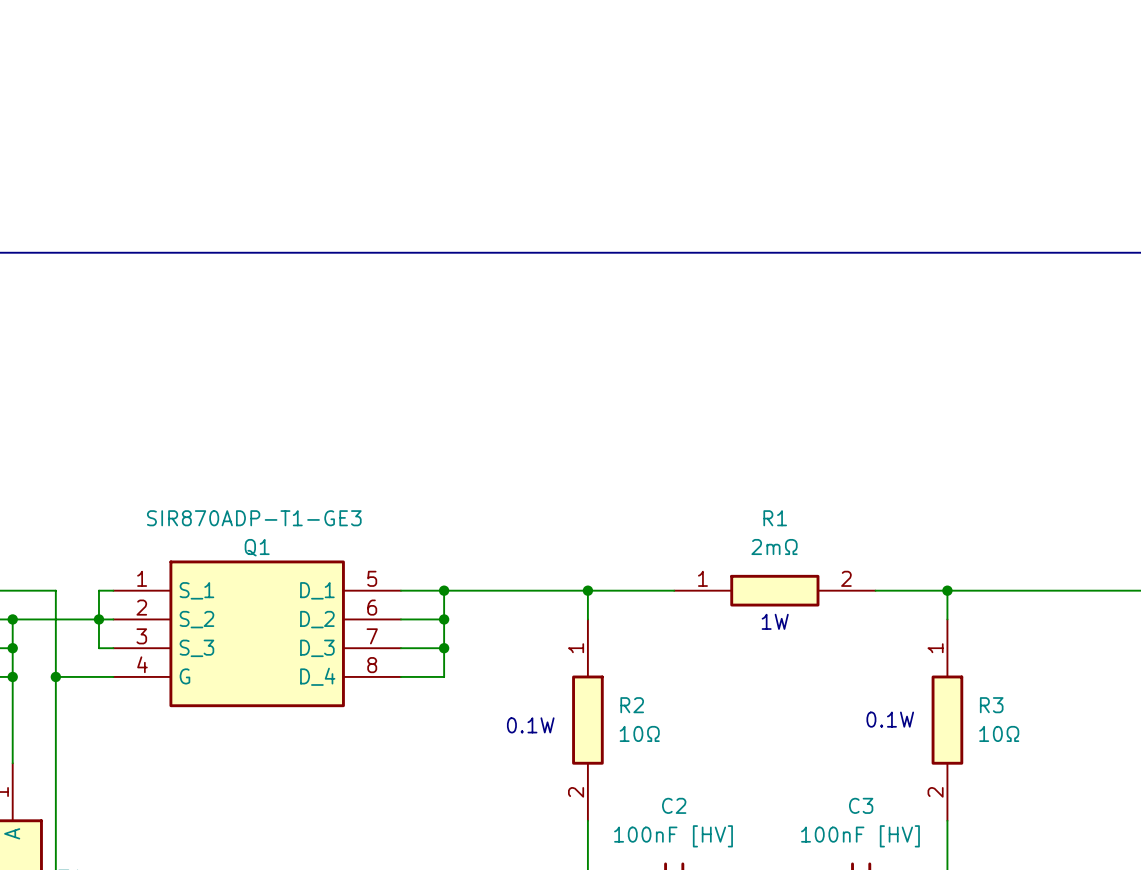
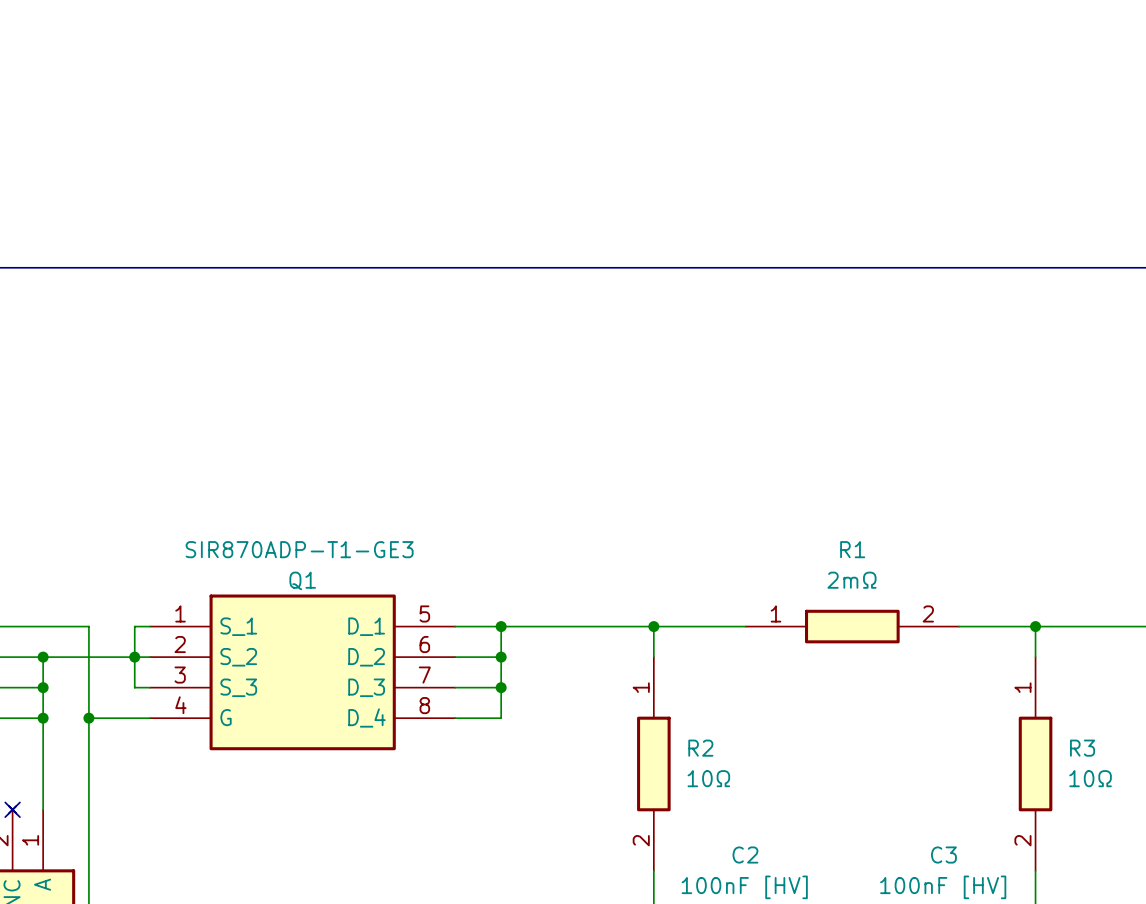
text: 1W (775, 621) -> none
text: 0.1W (890, 719) -> none
text: 0.1W (530, 725) -> none

